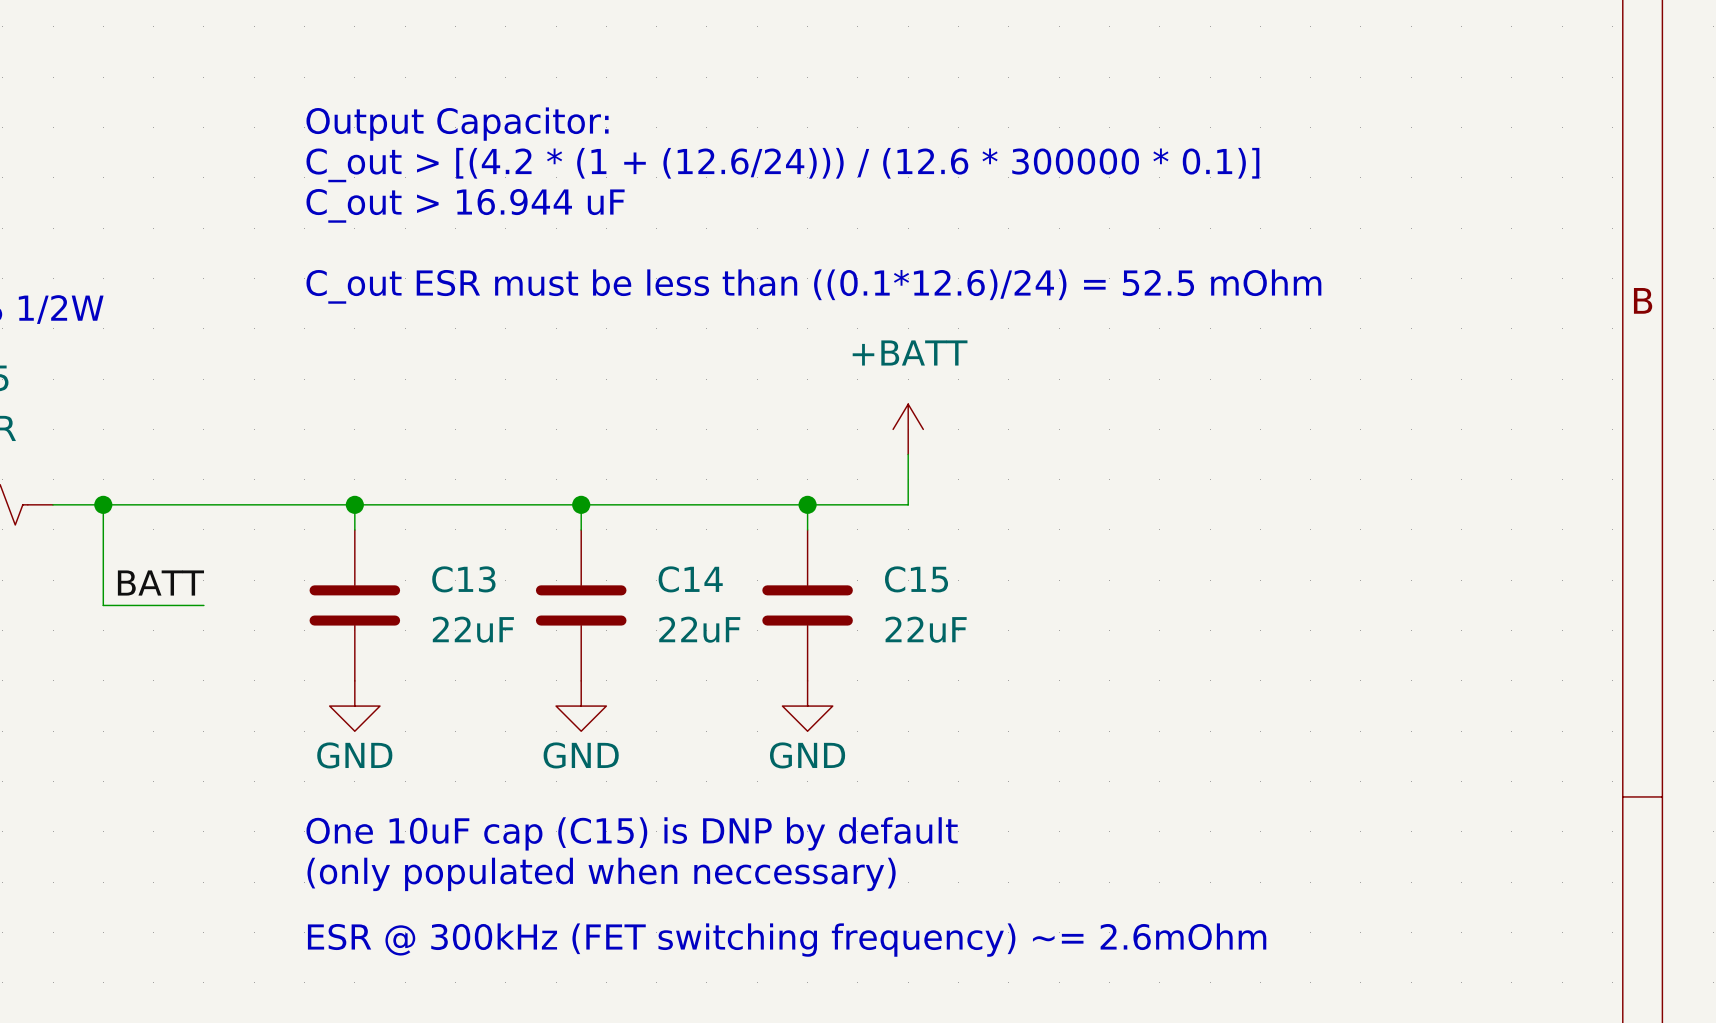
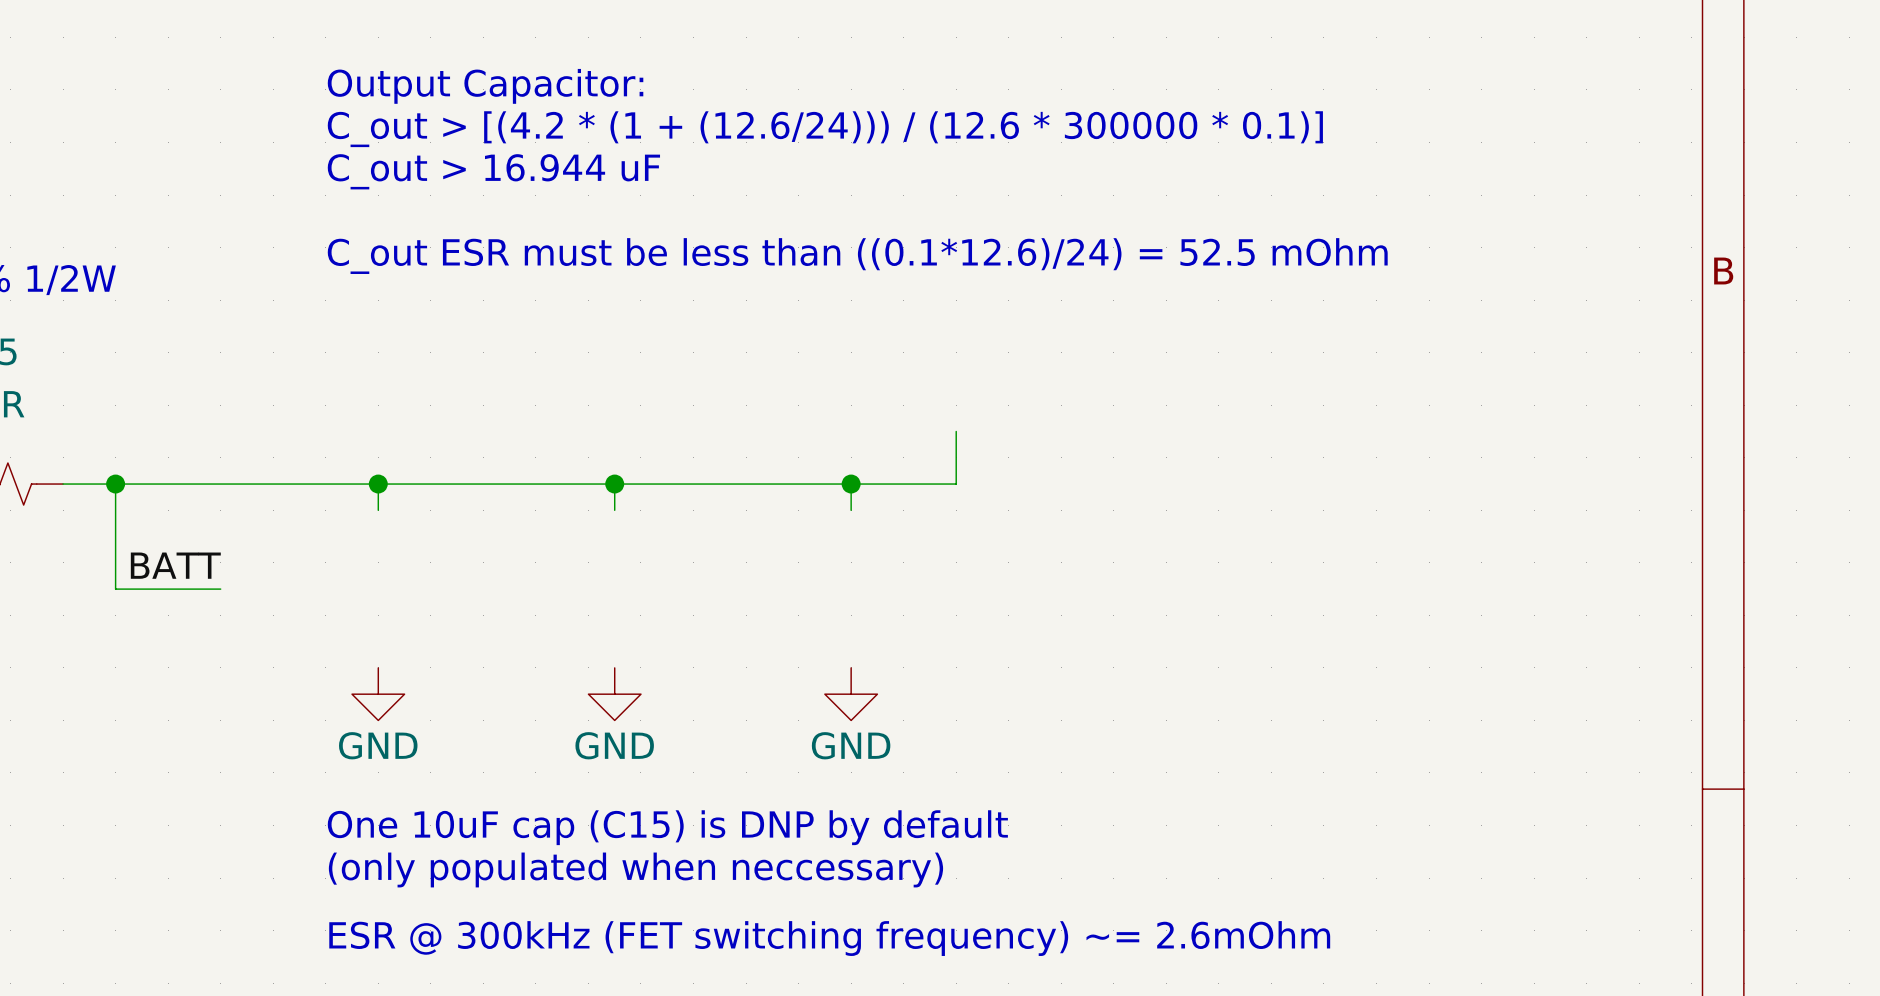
power symbol: +BATT (908, 429) -> none
C13: 22uF (354, 605) -> none
C14: 22uF (581, 605) -> none
C15: 22uF (807, 605) -> none

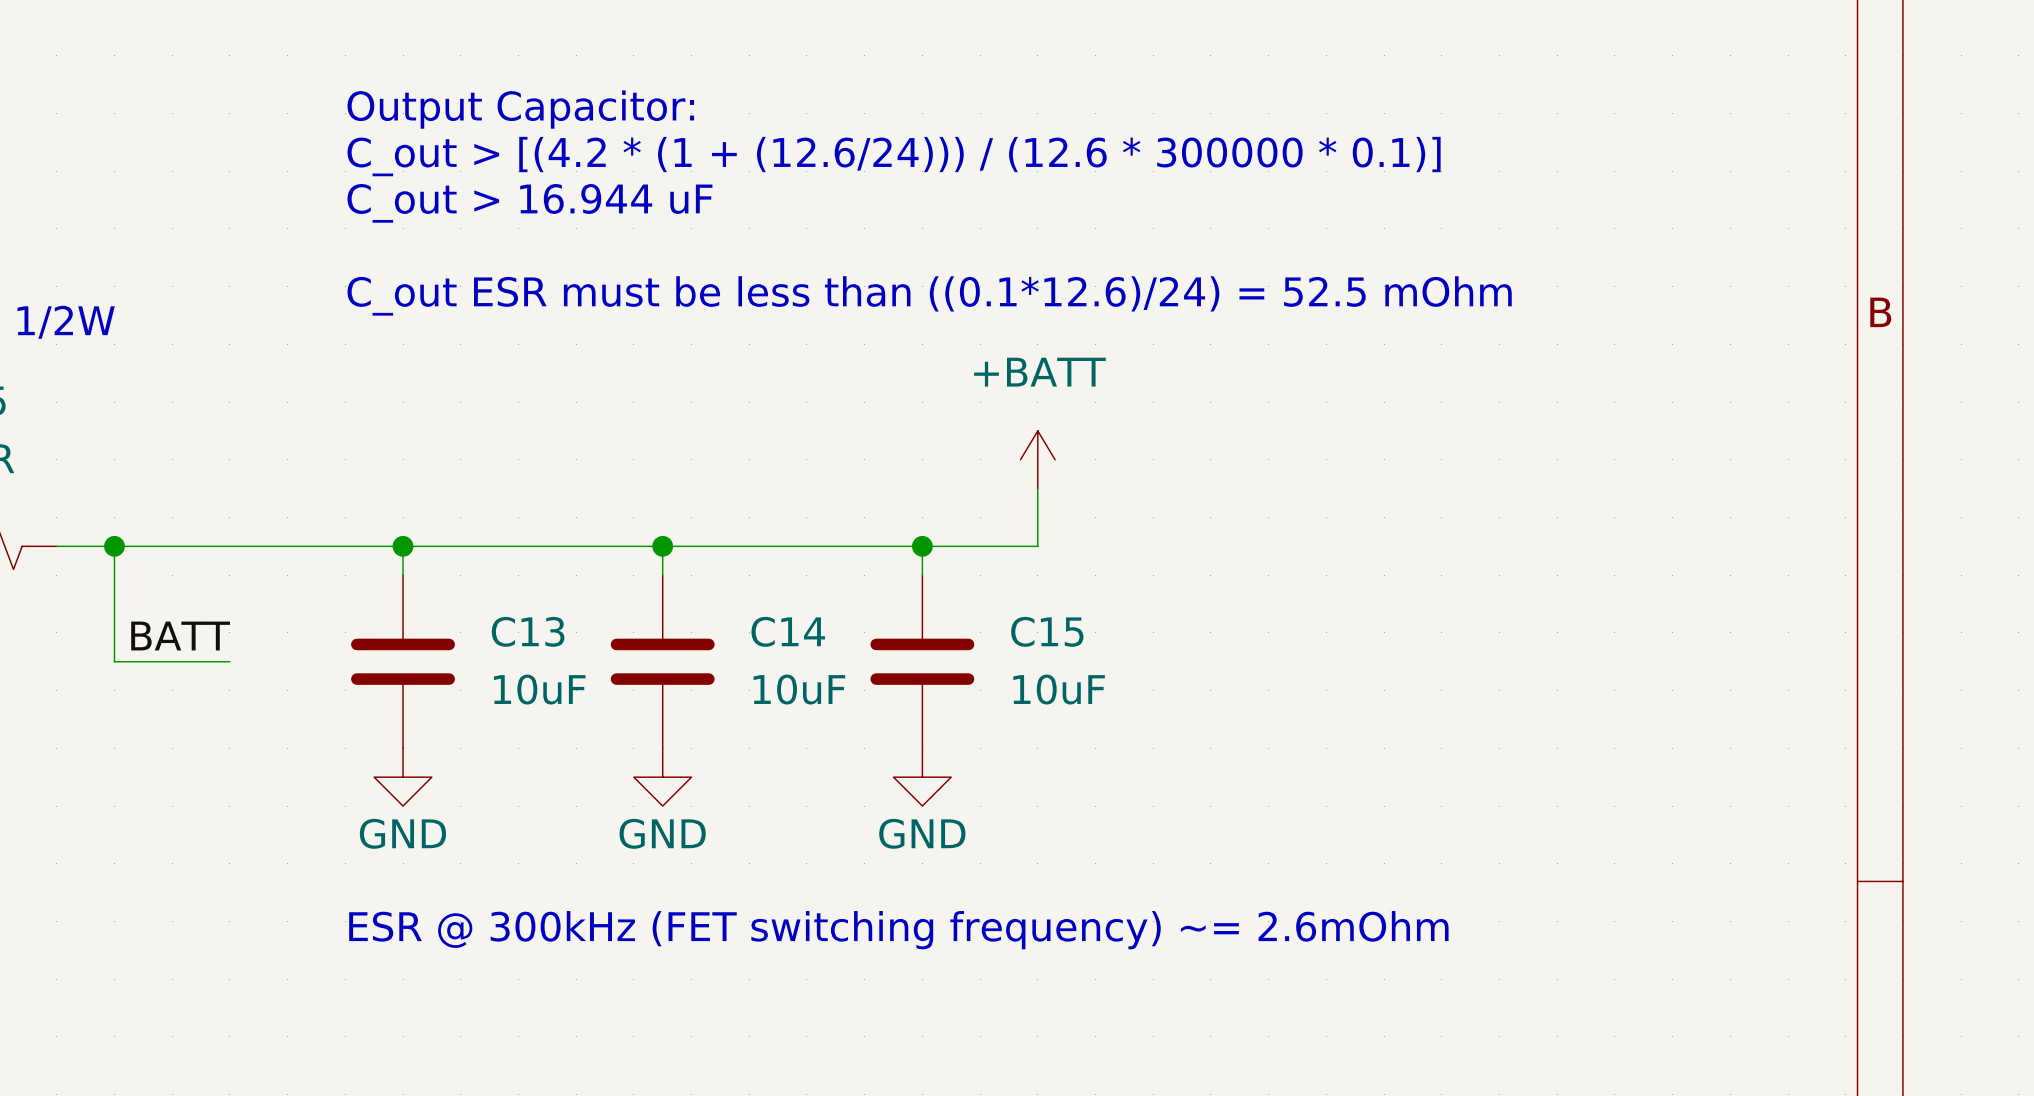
power symbol: none -> +BATT (1037, 459)
C13: none -> 10uF (403, 661)
C14: none -> 10uF (662, 661)
C15: none -> 10uF (922, 661)
text: One 10uF cap (C15) is DNP by default (667, 827) -> none
text: (only populated when neccessary) (635, 869) -> none
text position: ESR @ 300kHz (FET switching frequency) ~= 2.6mOhm (829, 938) -> ESR @ 300kHz (FET switching frequency) ~= 2.6mOhm (898, 930)

